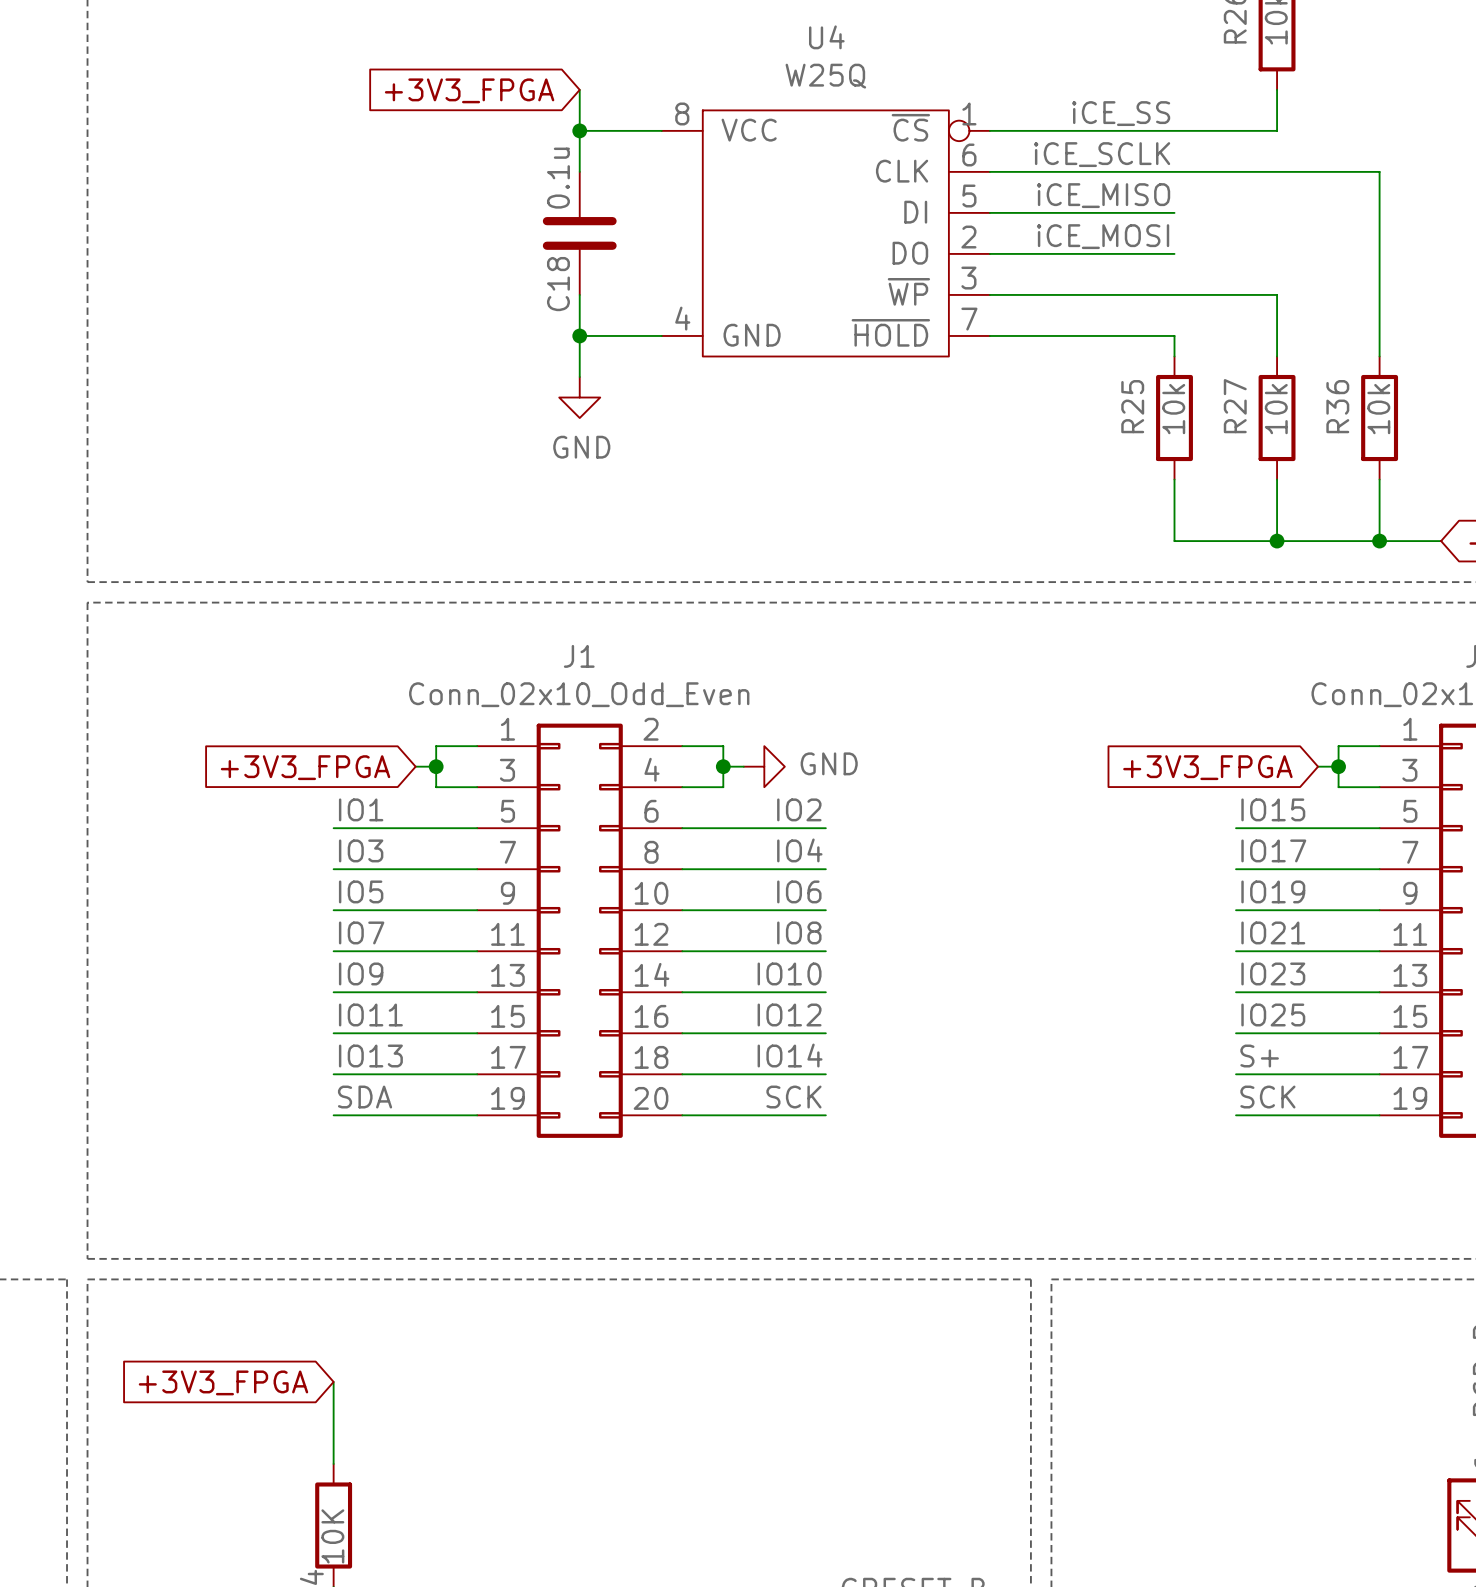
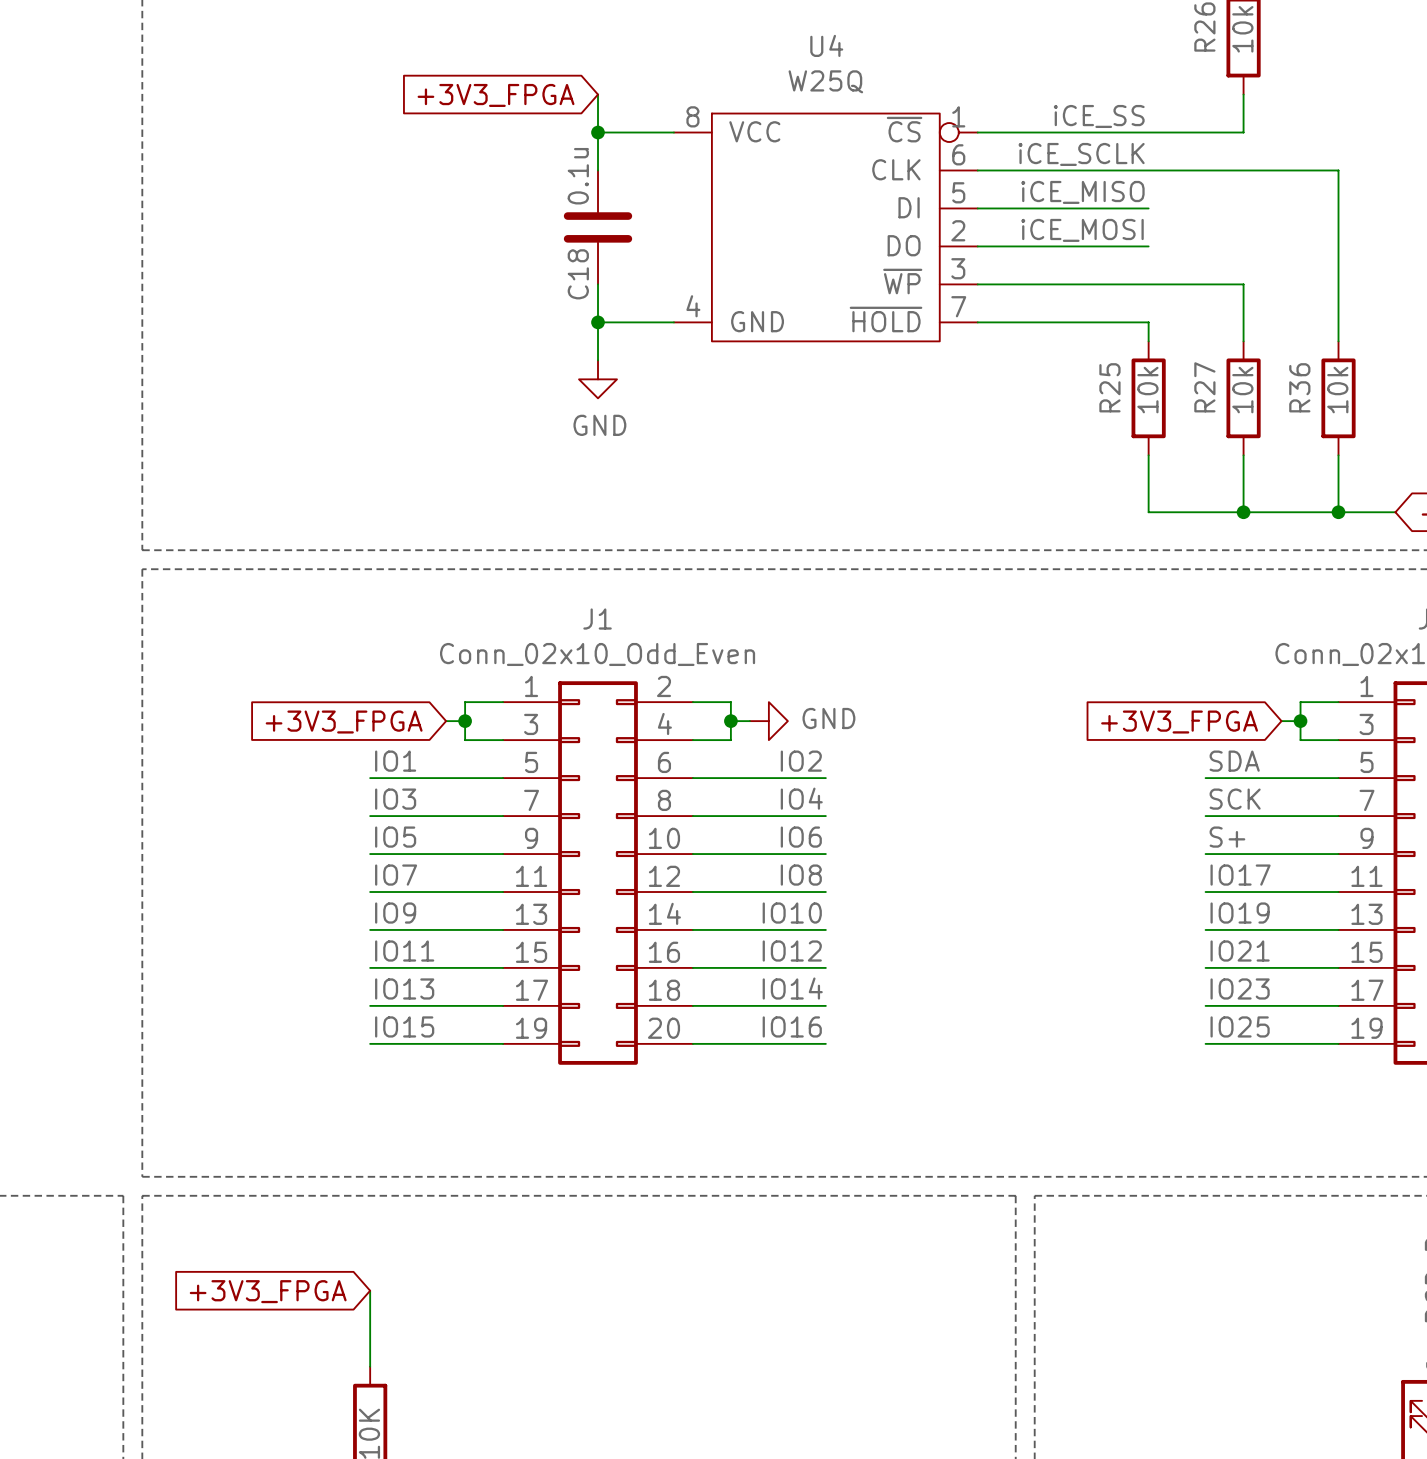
label: IO15 (1273, 809) -> SDA (1234, 761)
label: IO17 (1273, 850) -> SCK (1235, 799)
label: IO19 (1273, 891) -> S+ (1227, 837)
label: IO21 (1273, 932) -> IO17 (1240, 875)
label: IO23 (1273, 973) -> IO19 (1240, 913)
label: IO25 (1273, 1014) -> IO21 (1240, 951)
label: S+ (1259, 1056) -> IO23 (1240, 988)
label: SDA (365, 1097) -> IO15 (404, 1026)
label: SCK (793, 1097) -> IO16 (792, 1026)
label: SCK (1267, 1097) -> IO25 (1240, 1026)

